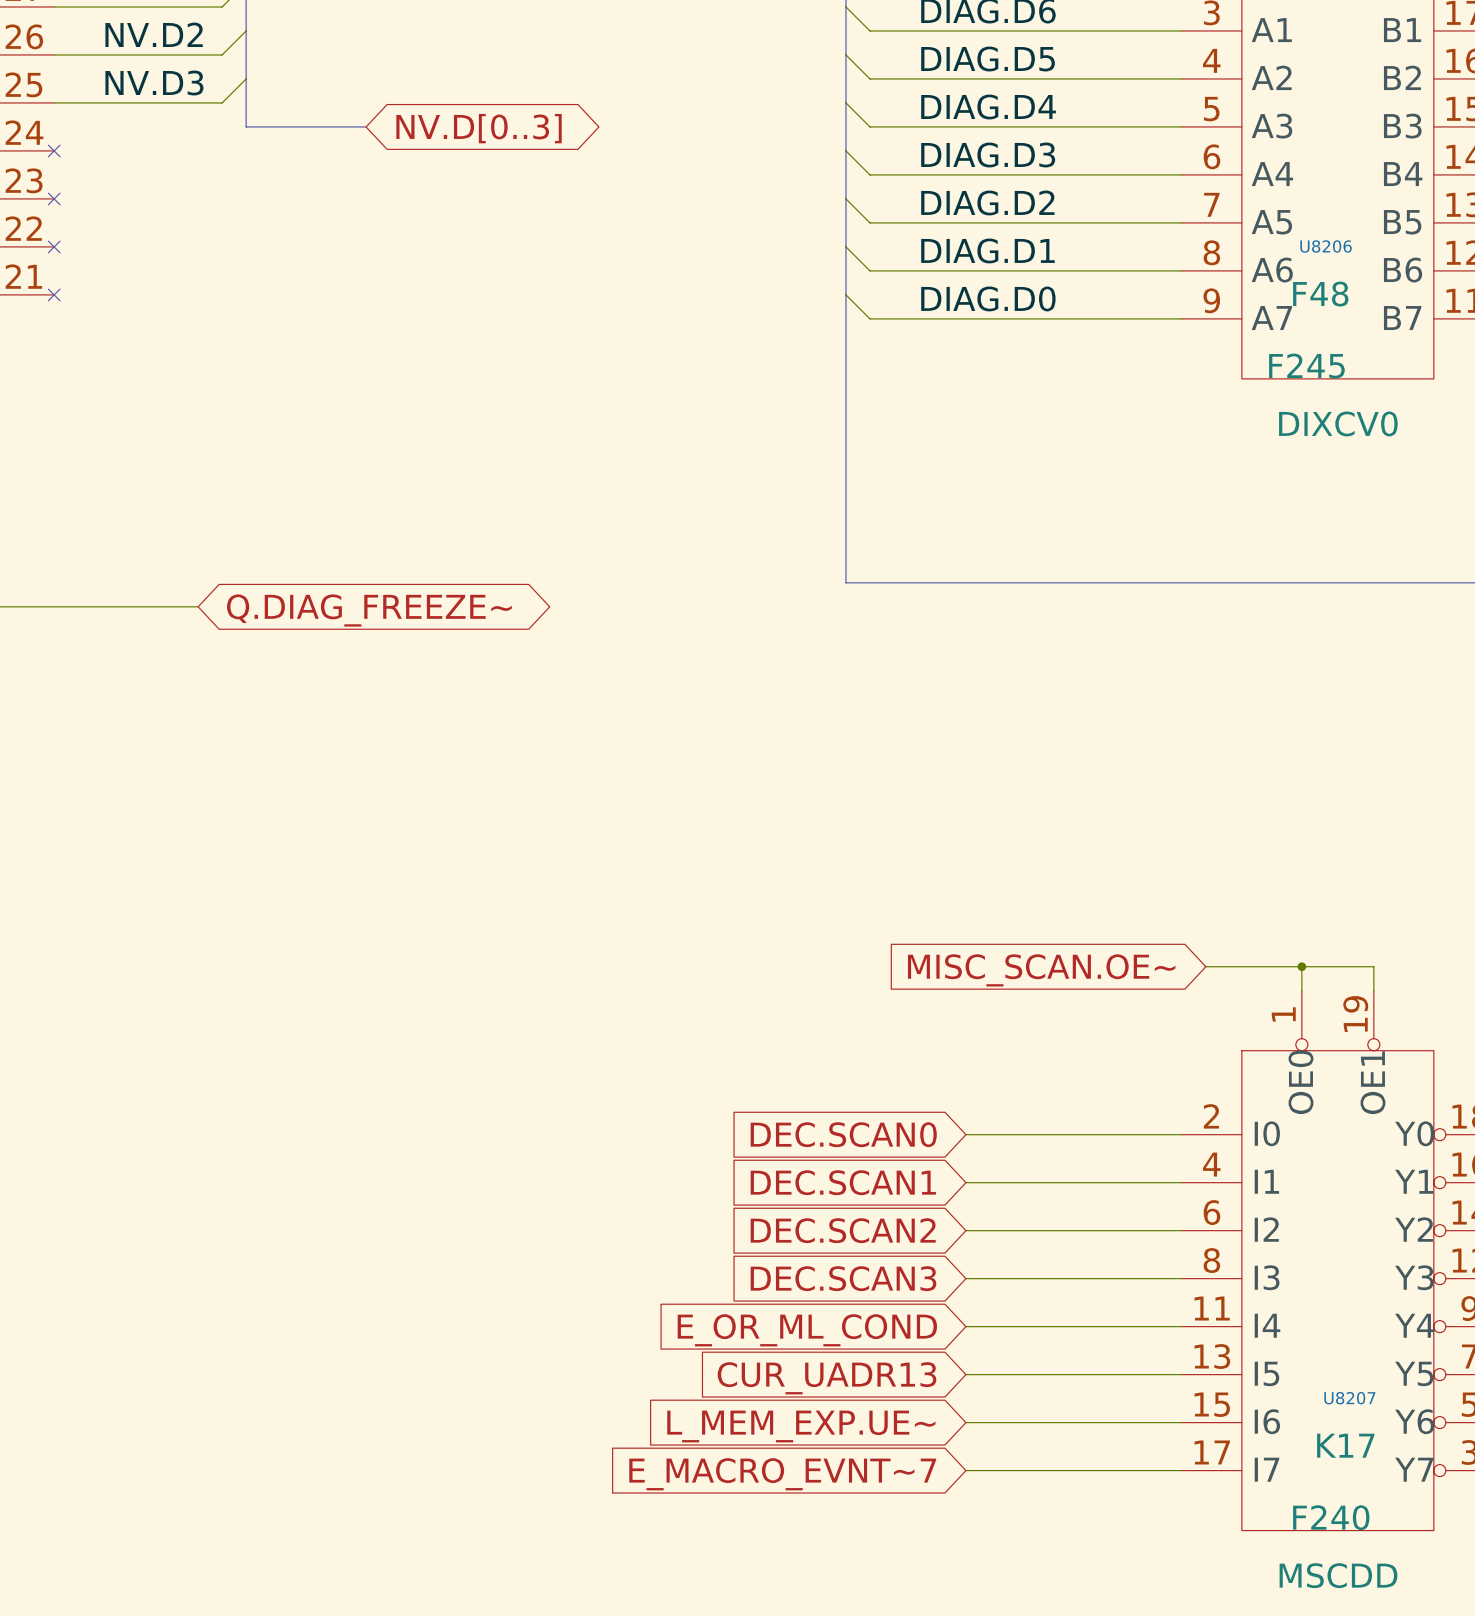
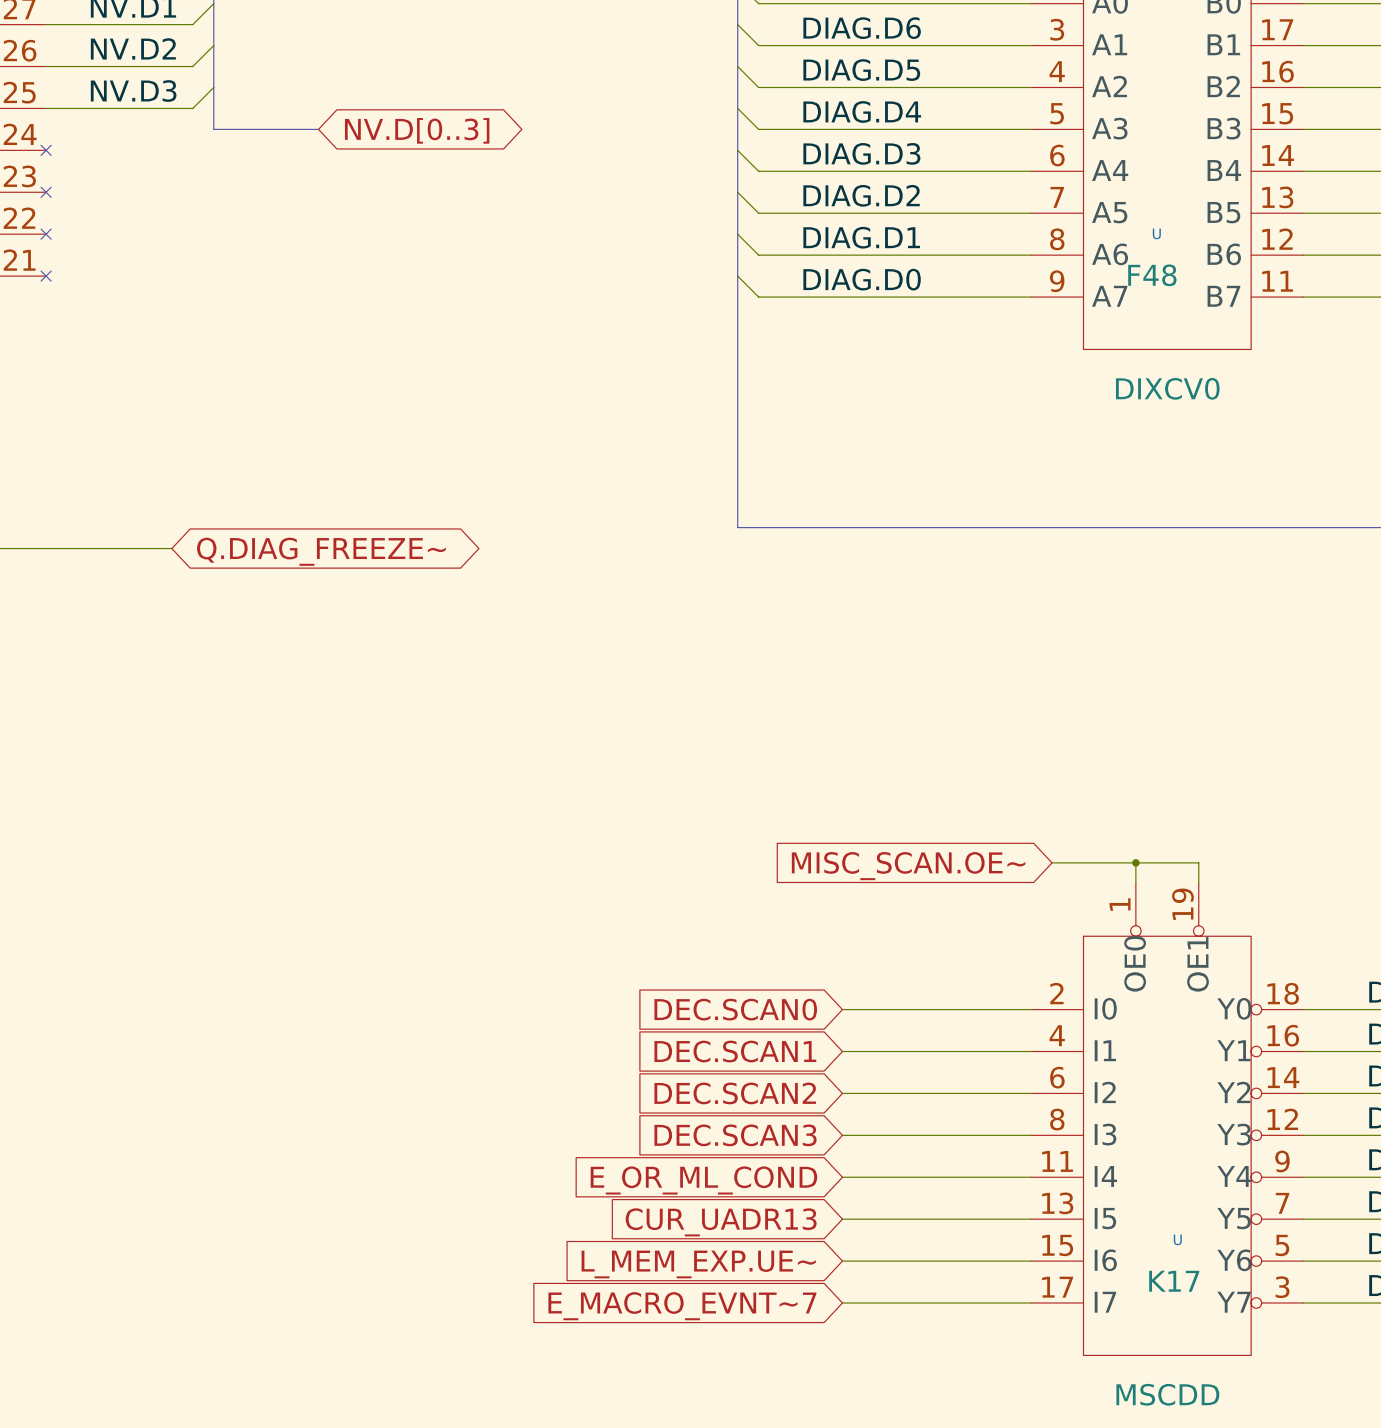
U8206 name: U8206 (1326, 246) -> U (1156, 233)
U8206 value: F245 (1306, 366) -> none
U8207 name: U8207 (1349, 1398) -> U (1177, 1239)
U8207 value: F240 (1331, 1517) -> none

